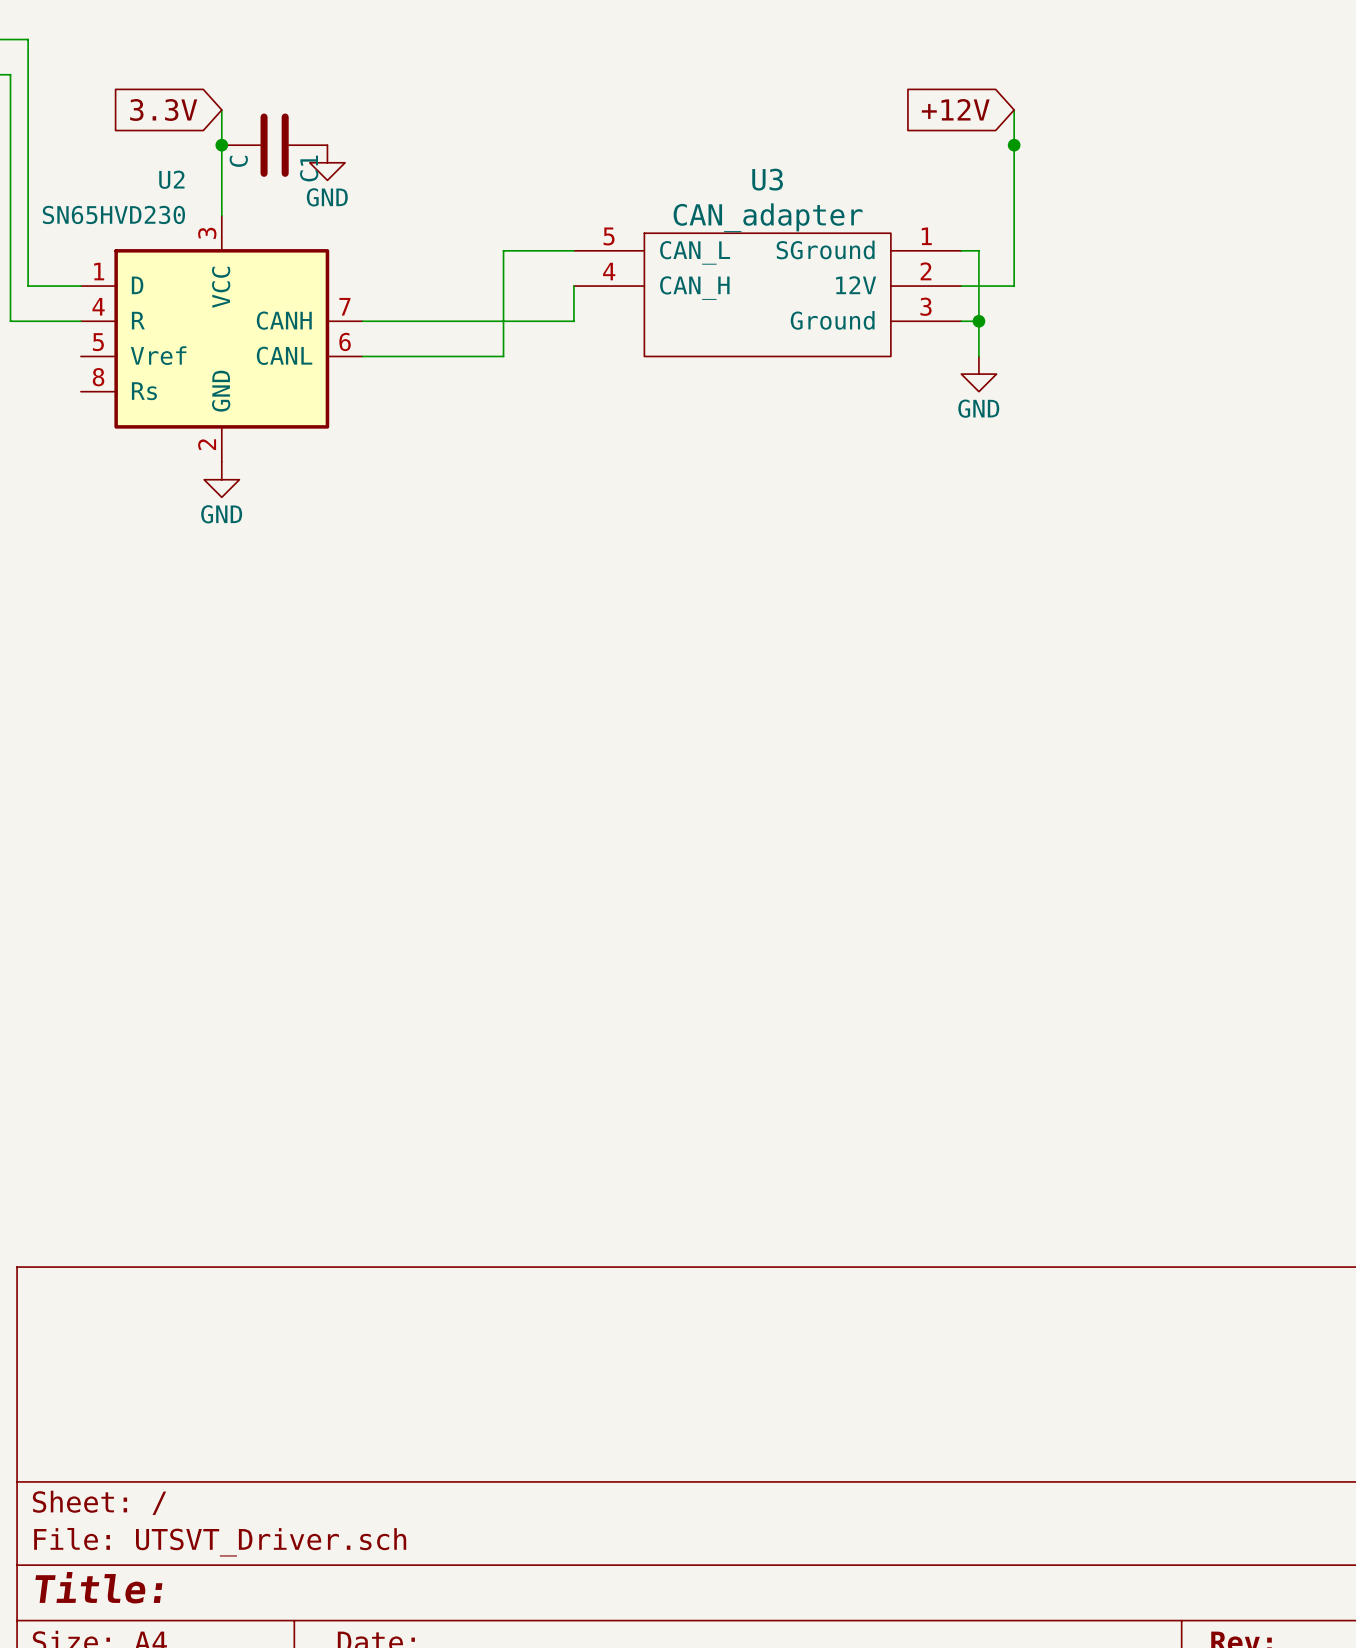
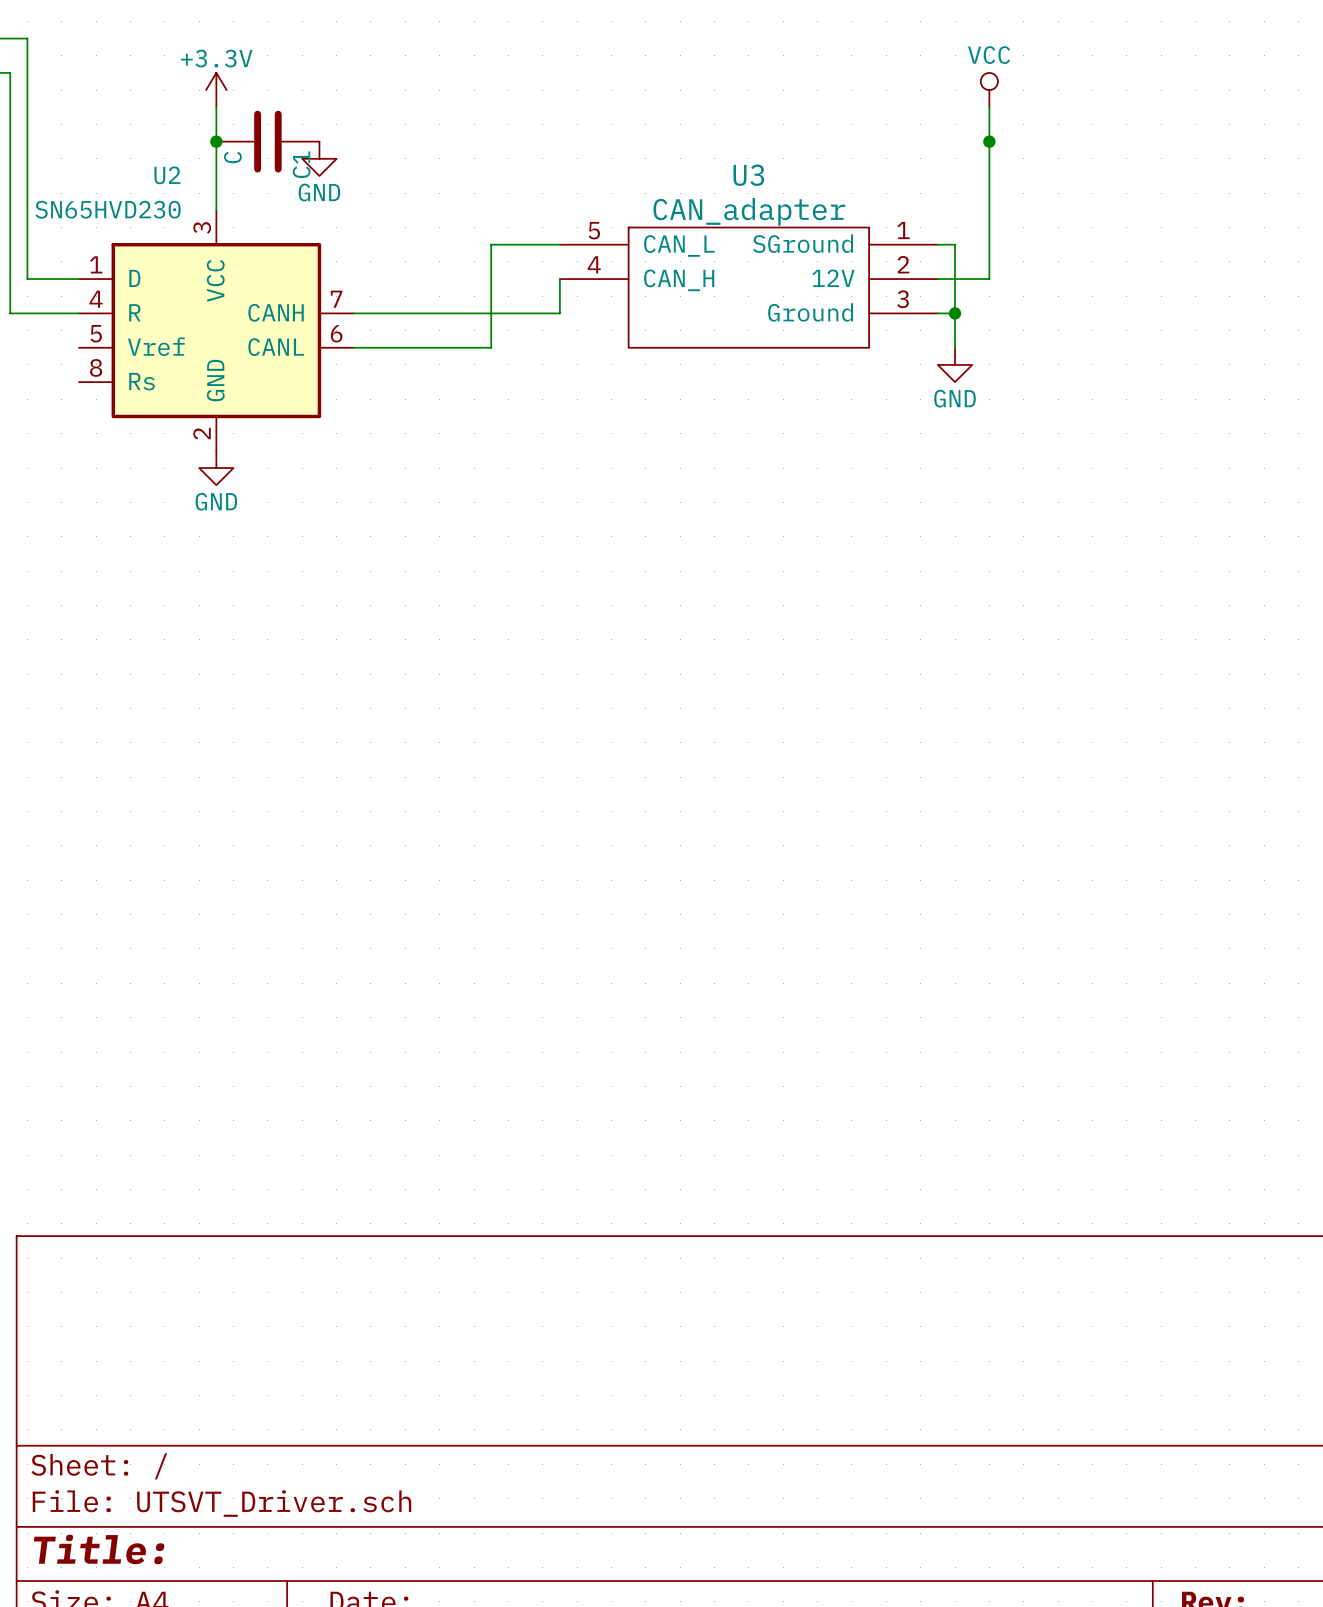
power symbol: none -> +3.3V (216, 90)
power symbol: none -> VCC (989, 90)
global label: 3.3V (163, 109) -> none
global label: +12V (955, 109) -> none

